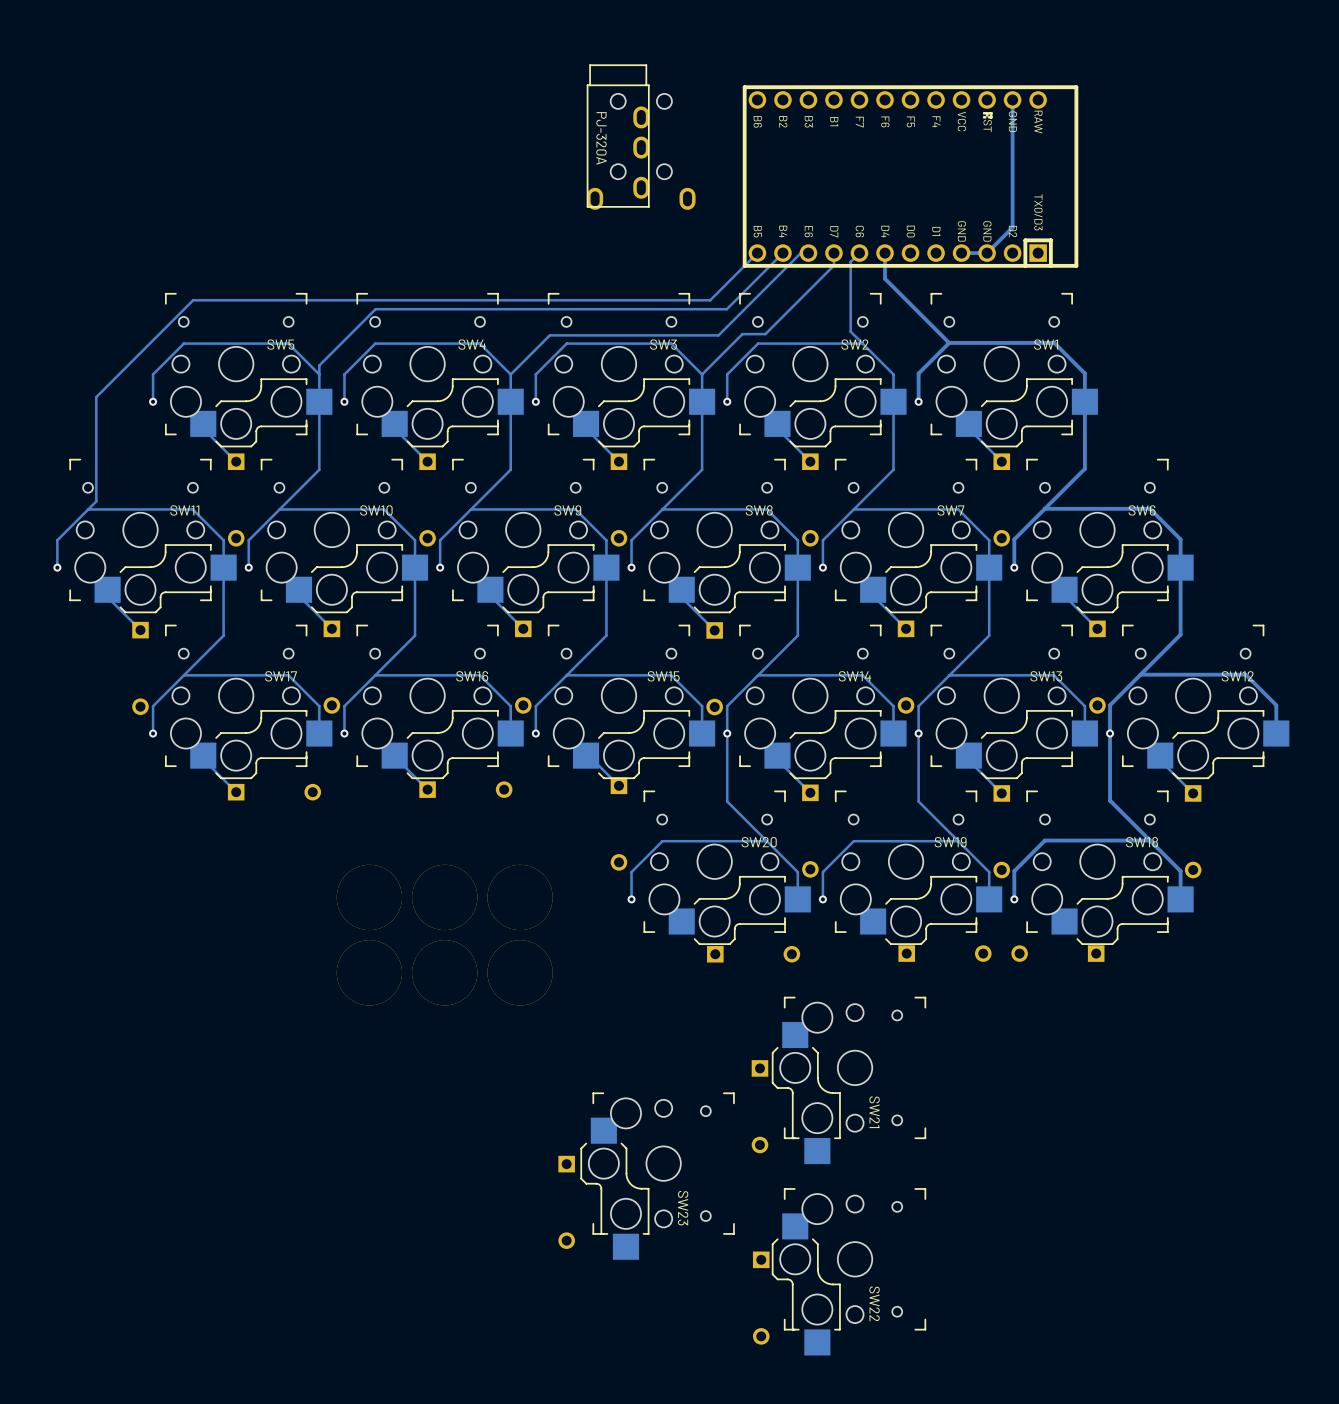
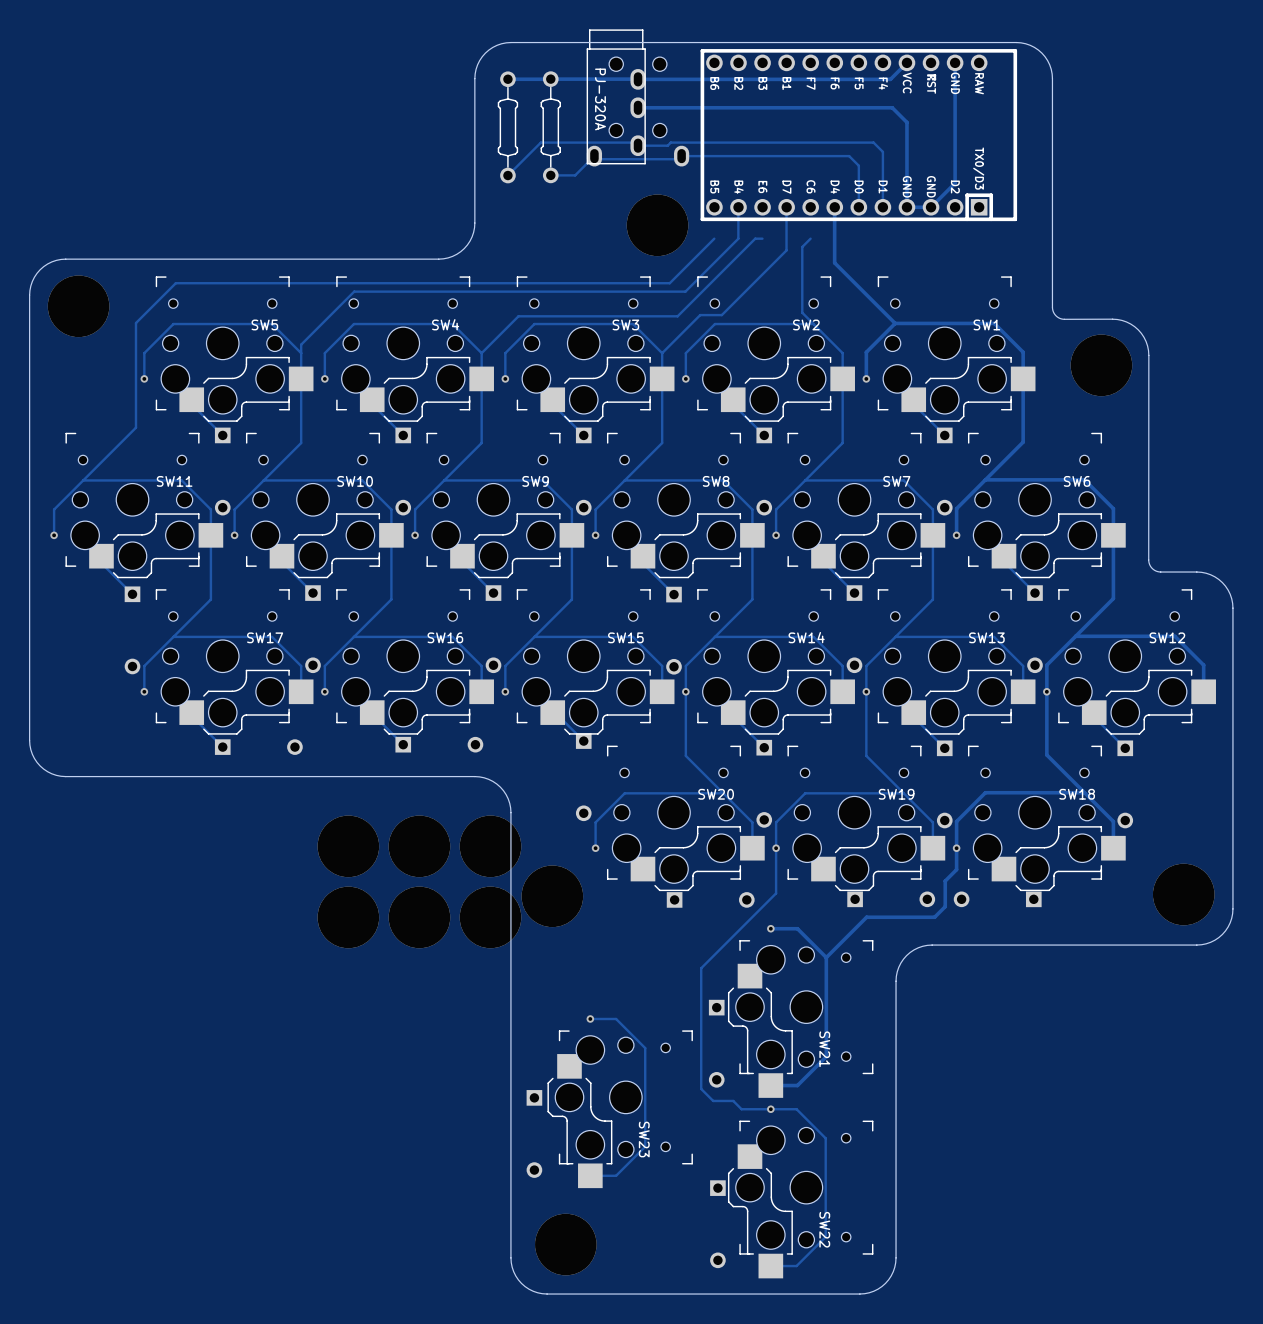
board edge: none -> (1016, 42) (501, 43) (485, 53) (476, 69) (474, 227) (470, 241) (456, 254) (438, 259) (65, 259) (56, 260) (43, 266) (32, 281) (29, 295) (29, 740) (34, 758) (47, 771) (65, 776) (474, 776) (488, 779) (500, 787) (508, 798) (510, 812) (510, 1257) (515, 1275) (521, 1283) (533, 1291) (547, 1294) (859, 1294) (877, 1289) (891, 1275) (895, 1262) (896, 981) (898, 967) (906, 955) (918, 947) (932, 945) (1201, 944) (1218, 937) (1230, 922) (1232, 908) (1231, 598) (1225, 586) (1210, 574) (1196, 572) (1159, 571) (1153, 569) (1149, 564) (1147, 346) (1138, 329) (1126, 321) (1112, 319) (1062, 319) (1057, 316) (1053, 311) (1052, 73) (1049, 64) (1041, 53) (1030, 45) (1016, 42)
track: none -> (906, 62) (890, 79) (550, 79)
track: none -> (955, 62) (955, 183) (931, 207) (906, 207) (906, 122) (892, 107) (638, 107)
track: none -> (550, 79) (507, 79)
track: (1012, 99) (1012, 227) (987, 253) (961, 253) -> none
part: none -> (550, 127)
part: none -> (507, 127)
part position: (641, 137) -> (637, 97)
track: none -> (540, 142) (634, 142) (638, 145) (667, 145) (670, 142) (873, 142) (882, 151) (882, 207)
track: none -> (540, 142) (507, 175)
part position: (910, 176) -> (858, 135)
track: none -> (550, 175) (575, 175) (594, 156) (597, 159) (678, 159) (681, 156) (849, 156) (858, 165) (858, 207)
track: none -> (738, 207) (738, 238)
track: none -> (786, 207) (786, 238)
track: none -> (834, 207) (834, 238)
part: none -> (657, 225)
track: (193, 300) (96, 397) (96, 501) -> (182, 283) (175, 283) (135, 323) (135, 427) (90, 472)
part: none -> (78, 306)
part: none -> (1101, 365)
track: none -> (776, 848) (776, 893) (701, 968) (701, 1088) (713, 1100) (733, 1100) (741, 1109) (796, 1109) (825, 1138) (825, 1236) (796, 1266) (770, 1266)
track: none -> (956, 848) (956, 869) (945, 881) (945, 906) (934, 917) (866, 917) (826, 957)
part: none -> (1183, 894)
part: none -> (552, 896)
track: none -> (770, 928) (797, 928) (826, 957)
via: none -> (770, 928)
track: none -> (826, 957) (826, 1056) (797, 1085) (770, 1085)
track: none -> (590, 1018) (616, 1018) (645, 1048) (645, 1146) (616, 1175) (590, 1175)
via: none -> (590, 1018)
via: none -> (770, 1109)
part: none -> (565, 1244)

